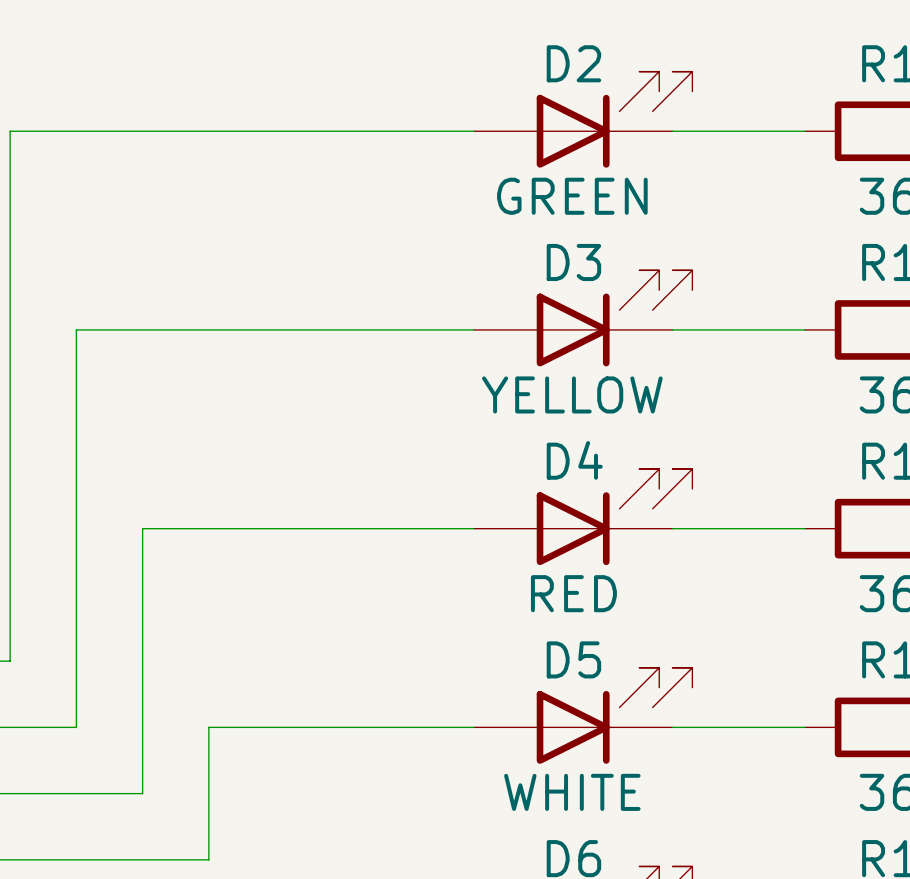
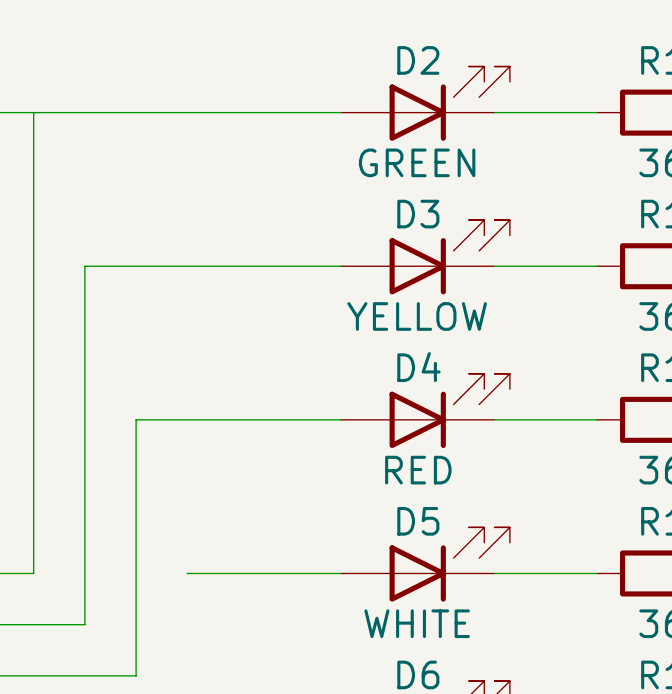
wire: (76, 329) (142, 329) -> (33, 266) (33, 112)
wire: (142, 528) (208, 528) -> (84, 419) (84, 266)
wire: (208, 727) (275, 727) -> (136, 573) (136, 419)

